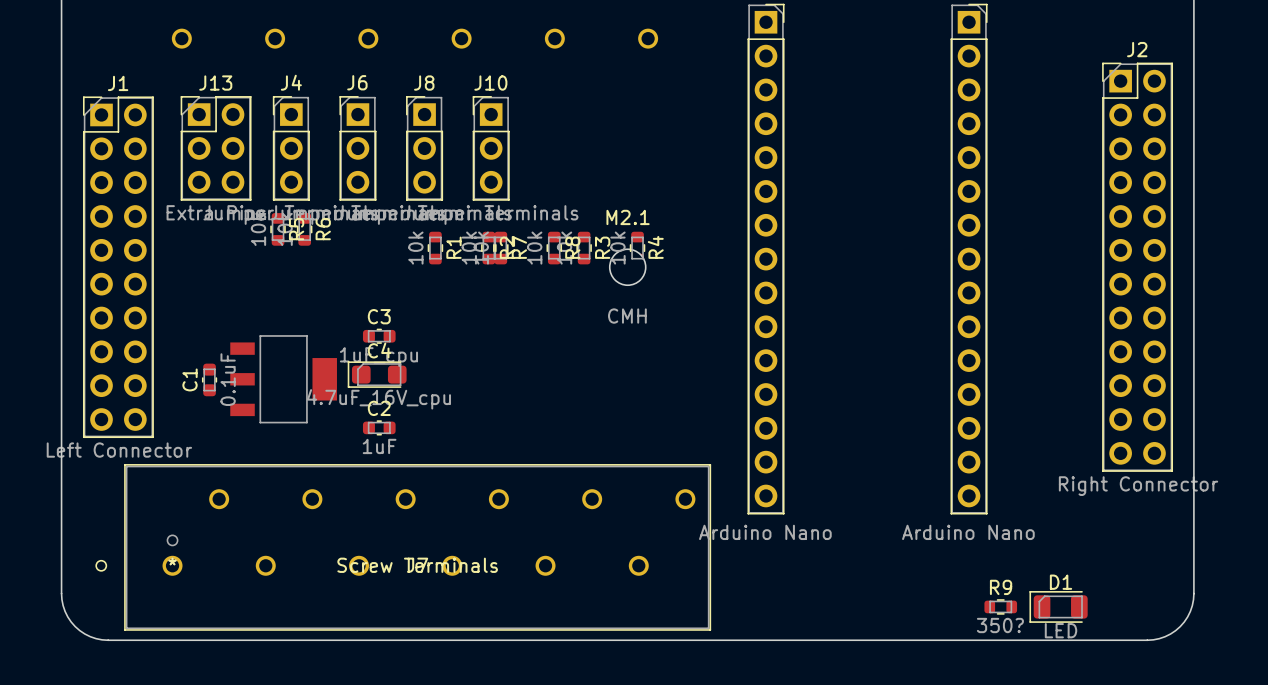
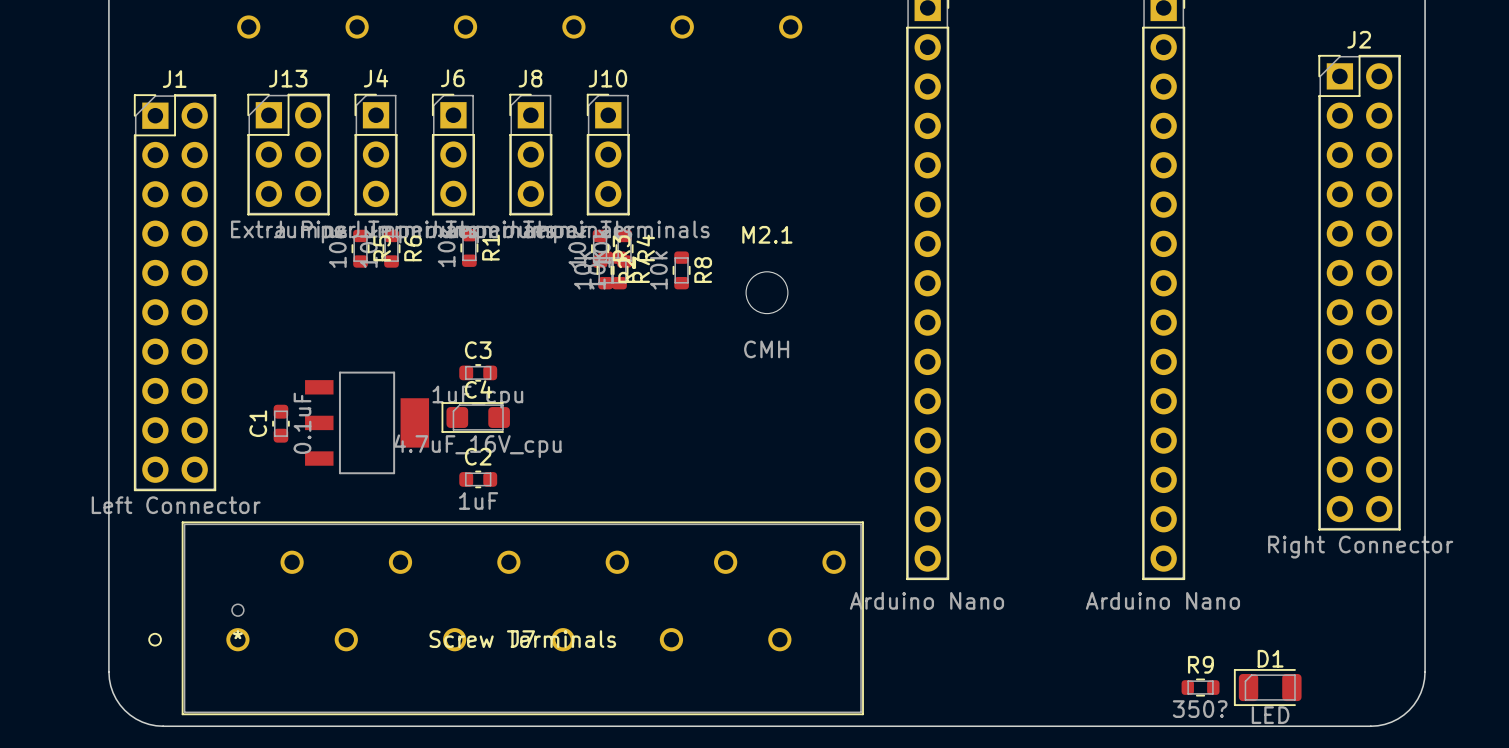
R1 position: (435, 248) -> (469, 247)
R3 position: (584, 248) -> (600, 248)
R4 position: (637, 248) -> (624, 248)

